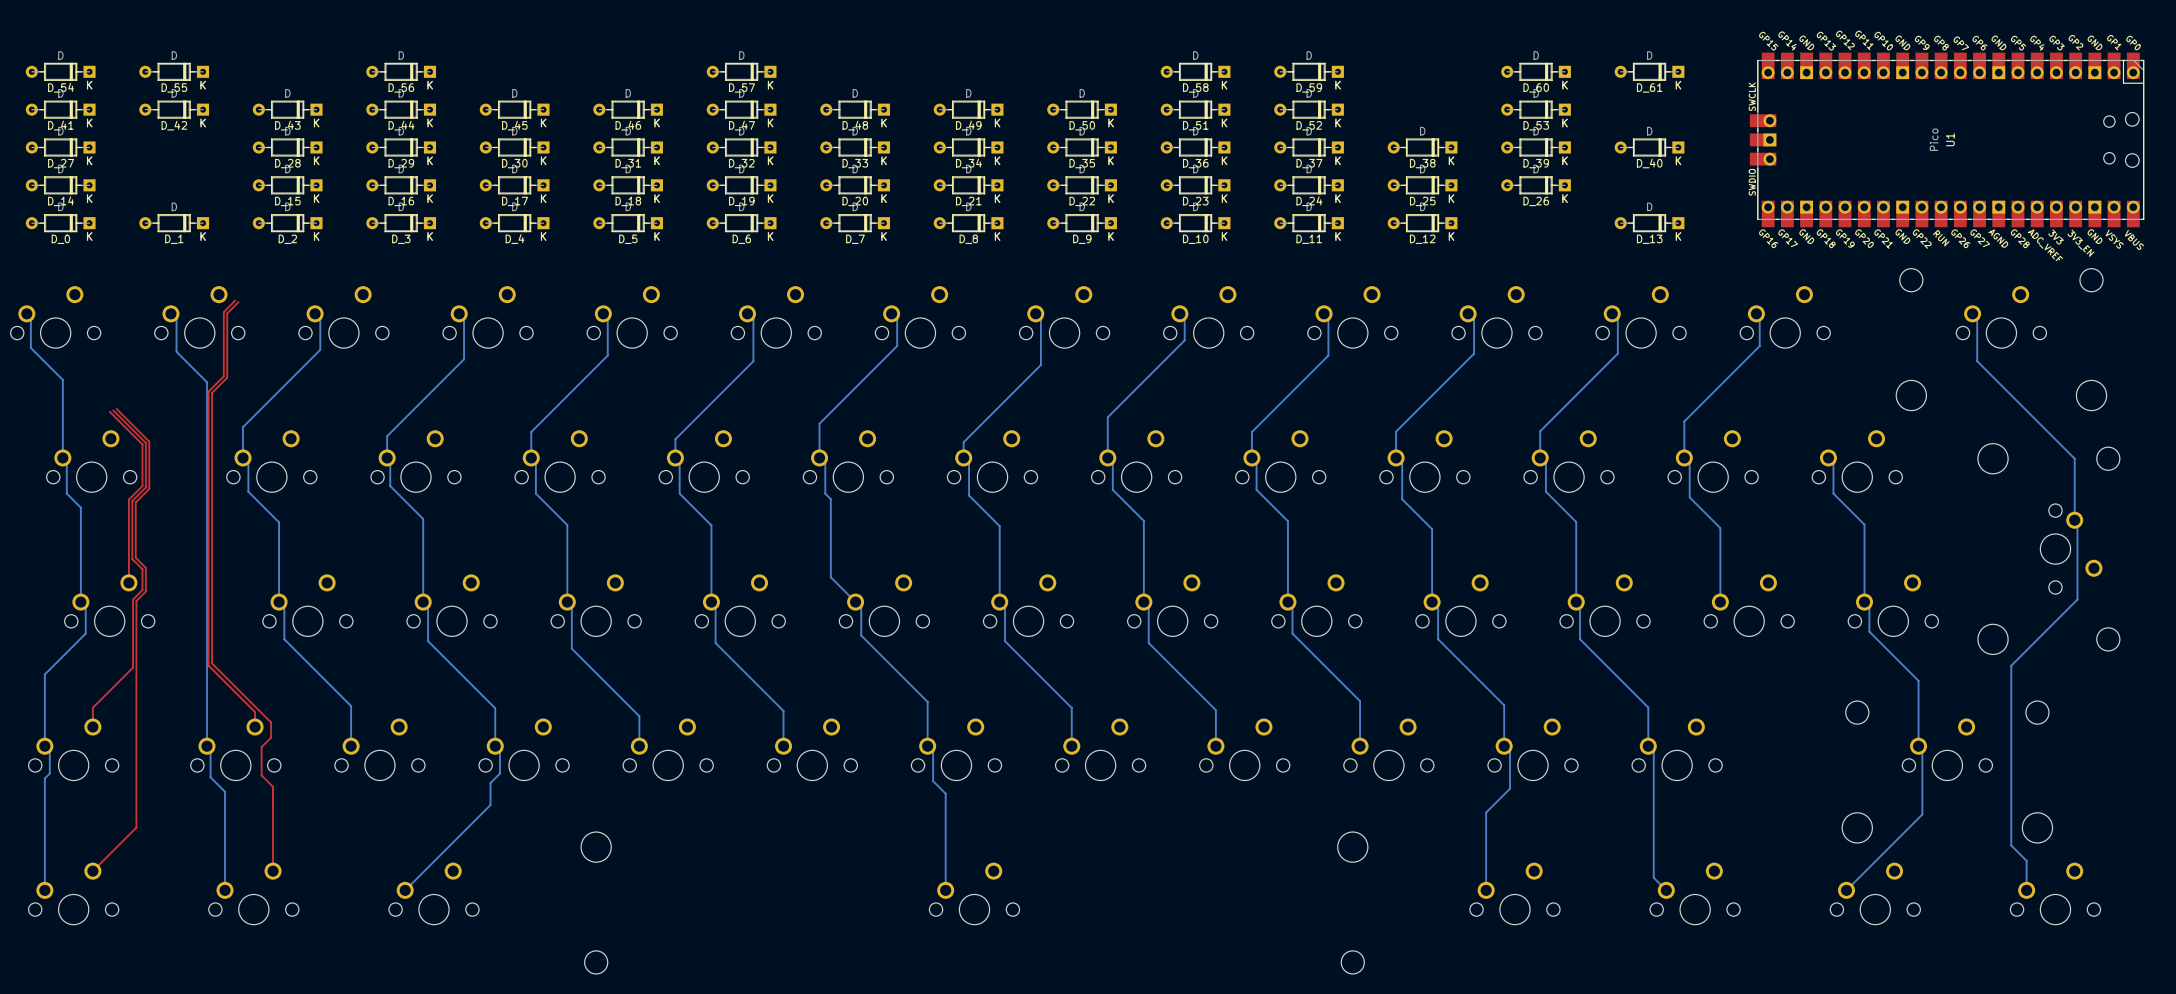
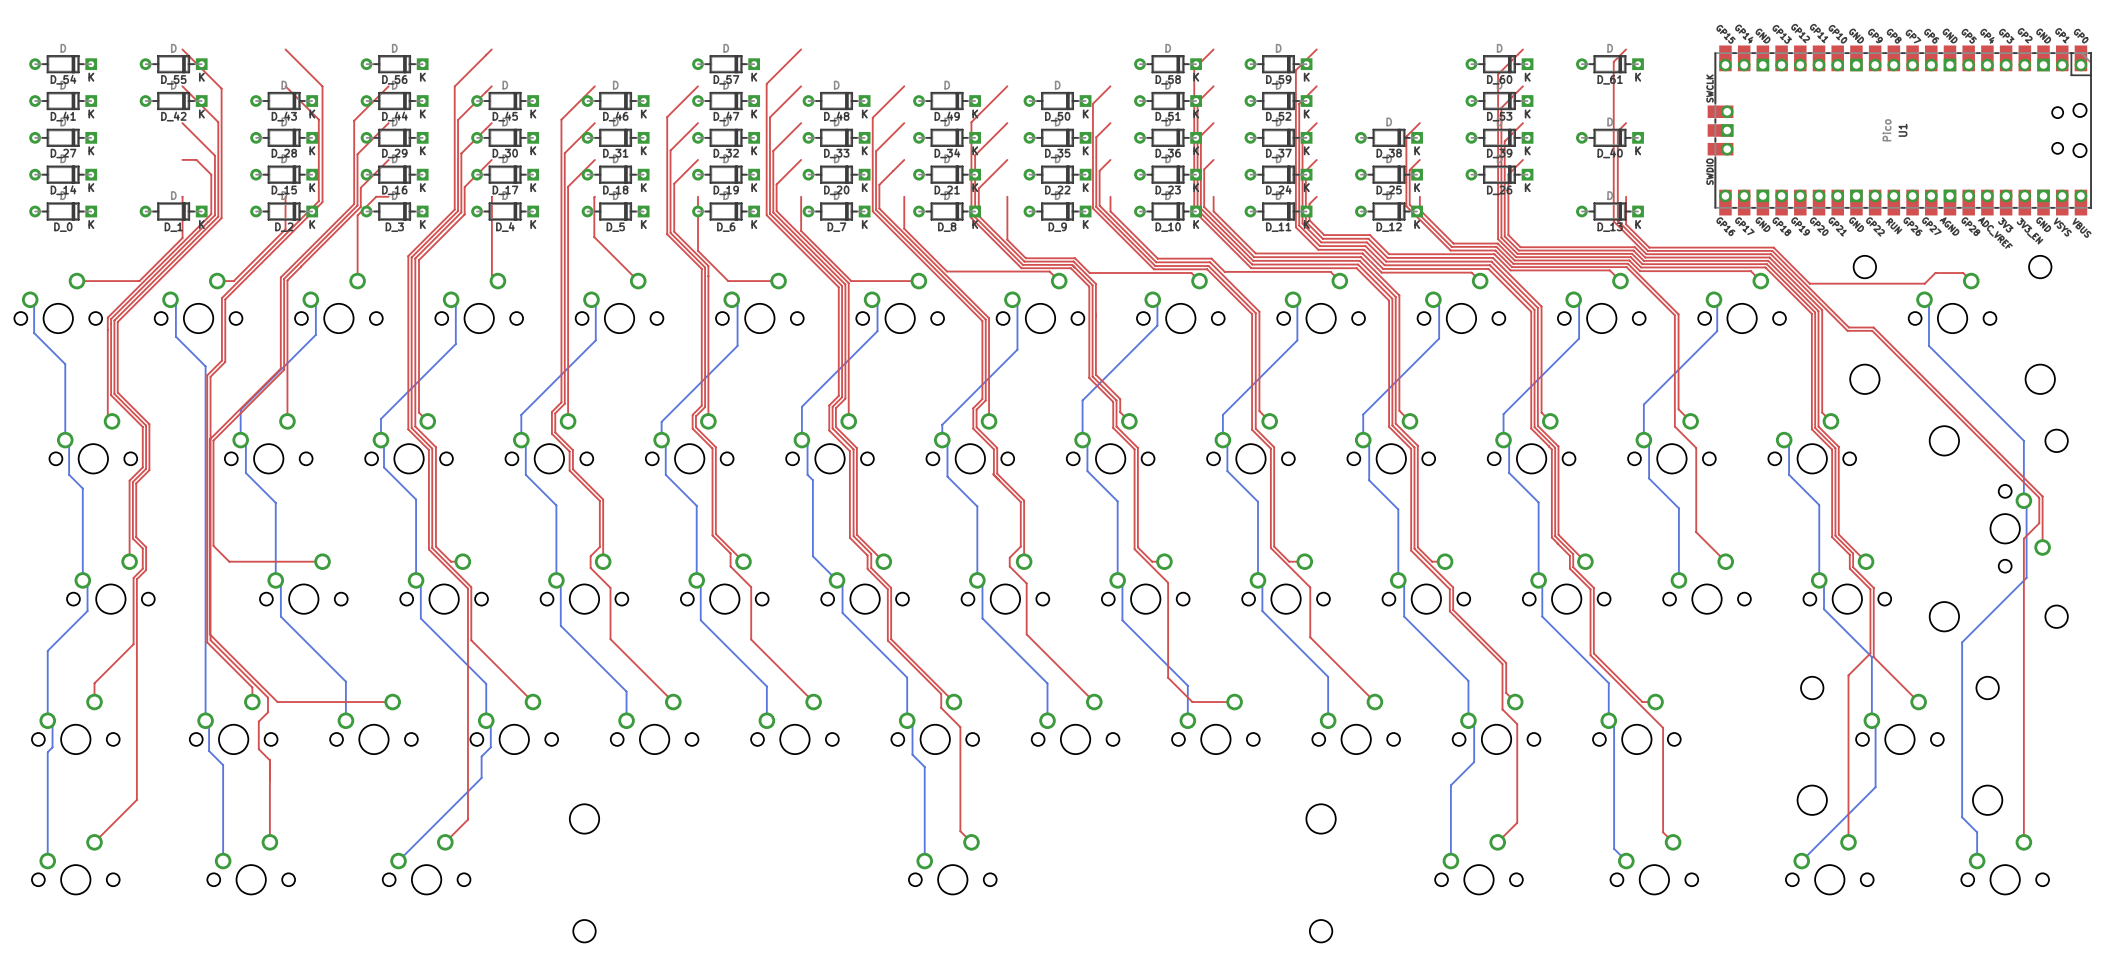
top track: none -> (182, 49) (221, 88) (221, 218) (117, 321) (117, 392)
top track: none -> (285, 49) (322, 86) (322, 202) (236, 288)
top track: none -> (491, 49) (454, 86) (454, 209) (408, 256) (408, 429) (428, 450) (428, 549) (467, 588) (467, 819) (445, 842)
top track: none -> (801, 49) (766, 83) (766, 215) (838, 287) (838, 395) (829, 405) (829, 430) (849, 451) (849, 537) (867, 555) (867, 569) (887, 589) (887, 640) (941, 693) (941, 707) (960, 727) (960, 831) (971, 842)
top track: none -> (1213, 49) (1194, 68) (1194, 211) (1251, 268) (1356, 268) (1389, 300) (1389, 426) (1411, 448) (1411, 550) (1449, 589) (1449, 611) (1502, 664) (1502, 709) (1517, 724) (1517, 822) (1497, 842)
top track: none -> (1316, 49) (1295, 70) (1295, 227) (1318, 249) (1364, 249) (1383, 268) (1488, 268) (1531, 311) (1531, 428) (1551, 449) (1551, 537) (1569, 555) (1569, 568) (1590, 589) (1590, 655) (1663, 727) (1663, 832) (1673, 842)
top track: none -> (1522, 49) (1498, 74) (1498, 239) (1516, 257) (1630, 257) (1641, 267) (1765, 267) (1811, 313) (1811, 429) (1832, 449) (1832, 537) (1849, 554) (1849, 568) (1870, 589) (1870, 653) (1848, 675) (1848, 842)
top track: none -> (1626, 49) (1613, 61) (1613, 221) (1646, 254) (1770, 254) (1847, 330) (1872, 330) (2039, 497) (2039, 523) (2023, 538) (2023, 842)
top track: none -> (182, 86) (218, 122) (218, 216) (114, 320) (114, 393)
top track: none -> (285, 86) (318, 119) (318, 201) (233, 287)
top track: none -> (388, 86) (354, 120) (354, 204) (280, 277) (280, 368) (209, 439) (209, 634) (277, 702) (392, 702)
top track: none -> (491, 86) (458, 120) (458, 211) (411, 257) (411, 428) (432, 448) (432, 548) (471, 587) (471, 640) (533, 702)
top track: none -> (594, 86) (561, 119) (561, 402) (551, 411) (551, 433) (569, 451) (569, 470) (599, 500) (599, 546) (590, 556) (590, 568) (610, 587) (610, 639) (673, 702)
top track: none -> (698, 86) (667, 117) (667, 234) (701, 268) (701, 405) (692, 414) (692, 428) (712, 448) (712, 535) (730, 553) (730, 566) (751, 587) (751, 639) (813, 702)
top track: none -> (801, 86) (769, 117) (769, 213) (842, 285) (842, 397) (832, 406) (832, 428) (853, 449) (853, 536) (871, 553) (871, 568) (891, 587) (891, 639) (953, 702)
top track: none -> (904, 86) (872, 117) (872, 211) (982, 320) (982, 399) (973, 408) (973, 428) (993, 449) (993, 475)
top track: none -> (1007, 86) (971, 122) (971, 218) (1021, 268) (1070, 268) (1089, 286) (1089, 377) (1113, 401) (1113, 427) (1134, 449) (1134, 549) (1168, 582) (1168, 677) (1192, 702) (1234, 702)
top track: none -> (1110, 86) (1092, 103) (1092, 208) (1153, 269) (1207, 269) (1252, 314) (1252, 429) (1270, 448) (1270, 548) (1310, 587) (1310, 637) (1374, 702)
top track: none -> (1213, 86) (1197, 102) (1197, 209) (1252, 264) (1358, 264) (1392, 298) (1392, 425) (1414, 447) (1414, 548) (1453, 587) (1453, 609) (1506, 663) (1506, 692) (1515, 702)
top track: none -> (1316, 86) (1299, 103) (1299, 225) (1319, 246) (1365, 246) (1384, 265) (1489, 265) (1534, 309) (1534, 427) (1555, 447) (1555, 536) (1573, 554) (1573, 567) (1593, 587) (1593, 653) (1642, 702) (1655, 702)
top track: none -> (1522, 86) (1501, 107) (1501, 237) (1517, 253) (1632, 253) (1642, 264) (1766, 264) (1815, 312) (1815, 427) (1835, 448) (1835, 535) (1853, 553) (1853, 567) (1873, 587) (1873, 657) (1918, 702)
top track: none -> (182, 123) (214, 155) (214, 215) (208, 221)
top track: none -> (388, 123) (357, 154) (357, 205) (284, 278) (284, 369) (213, 440) (213, 545) (229, 561) (322, 561)
top track: none -> (491, 123) (461, 153) (461, 212) (415, 258) (415, 426) (435, 447) (435, 546) (451, 561) (462, 561)
top track: none -> (594, 123) (564, 153) (564, 403) (555, 413) (555, 432) (572, 450) (572, 469) (603, 499) (603, 561)
top track: none -> (698, 123) (670, 150) (670, 232) (705, 267) (705, 407) (695, 416) (695, 427) (715, 447) (715, 534) (743, 561)
top track: none -> (801, 123) (773, 150) (773, 212) (845, 284) (845, 398) (835, 408) (835, 427) (856, 448) (856, 534) (883, 561)
top track: none -> (904, 123) (876, 151) (876, 209) (985, 319) (985, 400) (976, 409) (976, 427) (997, 447) (997, 473) (1024, 500) (1024, 561)
top track: none -> (1007, 123) (975, 155) (975, 217) (1022, 264) (1072, 264) (1092, 285) (1092, 376) (1116, 400) (1116, 426) (1137, 447) (1137, 547) (1152, 561) (1164, 561)
top track: none -> (1110, 123) (1096, 137) (1096, 206) (1155, 266) (1208, 266) (1255, 313) (1255, 428) (1274, 447) (1274, 546) (1289, 561) (1304, 561)
top track: none -> (1213, 123) (1200, 135) (1200, 208) (1253, 260) (1359, 260) (1395, 296) (1395, 423) (1417, 445) (1417, 547) (1432, 561) (1445, 561)
top track: none -> (1316, 123) (1302, 137) (1302, 223) (1321, 242) (1366, 242) (1386, 261) (1491, 261) (1537, 307) (1537, 425) (1558, 446) (1558, 534) (1585, 561)
top track: none -> (1419, 123) (1406, 136) (1406, 206) (1450, 250) (1495, 250) (1511, 267) (1626, 267) (1674, 315) (1674, 426) (1696, 447) (1696, 532) (1725, 561)
top track: none -> (1522, 123) (1504, 141) (1504, 236) (1518, 250) (1633, 250) (1643, 260) (1768, 260) (1818, 311) (1818, 426) (1838, 446) (1838, 534) (1866, 561)
top track: none -> (1626, 123) (1617, 131) (1617, 220) (1647, 250) (1772, 250) (1848, 327) (1873, 327) (2042, 496) (2042, 547)
top track: none -> (182, 159) (196, 159) (211, 174) (211, 214) (107, 317) (107, 417)
top track: none -> (388, 159) (360, 187) (360, 206) (287, 280) (287, 421)
top track: none -> (491, 159) (464, 187) (464, 214) (418, 260) (418, 412) (427, 421)
top track: none -> (594, 159) (568, 186) (568, 421)
top track: none -> (698, 159) (674, 183) (674, 231) (708, 265) (708, 421)
top track: none -> (801, 159) (776, 184) (776, 211) (848, 283) (848, 421)
top track: none -> (904, 159) (879, 184) (879, 208) (989, 318) (989, 421)
top track: none -> (1007, 159) (978, 188) (978, 215) (1024, 261) (1073, 261) (1095, 283) (1095, 374) (1120, 399) (1120, 412) (1129, 421)
top track: none -> (1110, 159) (1099, 170) (1099, 205) (1156, 262) (1210, 262) (1259, 311) (1259, 411) (1269, 421)
top track: none -> (1213, 159) (1204, 169) (1204, 207) (1254, 257) (1361, 257) (1399, 295) (1399, 410) (1409, 421)
top track: none -> (1316, 159) (1305, 170) (1305, 221) (1322, 238) (1368, 238) (1387, 257) (1492, 257) (1541, 306) (1541, 412) (1550, 421)
top track: none -> (1419, 159) (1409, 170) (1409, 204) (1451, 246) (1496, 246) (1513, 263) (1627, 263) (1678, 314) (1678, 409) (1690, 421)
top track: none -> (1522, 159) (1508, 174) (1508, 235) (1520, 247) (1634, 247) (1645, 257) (1769, 257) (1822, 310) (1822, 412) (1830, 421)
top track: none -> (182, 196) (182, 238) (139, 281) (76, 281)
top track: none -> (285, 196) (285, 229) (233, 281) (217, 281)
top track: none -> (388, 196) (376, 196) (357, 215) (357, 281)
top track: none -> (491, 196) (491, 275) (497, 281)
top track: none -> (594, 196) (594, 237) (638, 281)
top track: none -> (698, 196) (698, 250) (728, 281) (778, 281)
top track: none -> (801, 196) (801, 230) (851, 281) (918, 281)
top track: none -> (904, 196) (904, 228) (947, 271) (1049, 271) (1059, 281)
top track: none -> (1007, 196) (1007, 239) (1025, 258) (1074, 258) (1089, 273) (1191, 273) (1199, 281)
top track: none -> (1110, 196) (1110, 211) (1157, 258) (1211, 258) (1224, 271) (1330, 271) (1339, 281)
top track: none -> (1213, 196) (1213, 211) (1255, 253) (1362, 253) (1381, 272) (1471, 272) (1480, 281)
top track: none -> (1316, 196) (1309, 203) (1309, 220) (1324, 235) (1369, 235) (1389, 254) (1494, 254) (1510, 270) (1609, 270) (1620, 281)
top track: none -> (1419, 196) (1419, 209) (1453, 243) (1497, 243) (1514, 260) (1629, 260) (1640, 271) (1750, 271) (1760, 281)
top track: none -> (1626, 196) (1626, 224) (1649, 247) (1773, 247) (1809, 283) (1924, 283) (1935, 273) (1963, 273) (1971, 281)
top track: none -> (208, 221) (111, 319) (111, 395)
top track: none -> (993, 474) (1020, 501) (1020, 546) (1009, 557) (1009, 566) (1026, 583) (1026, 634) (1094, 702)

